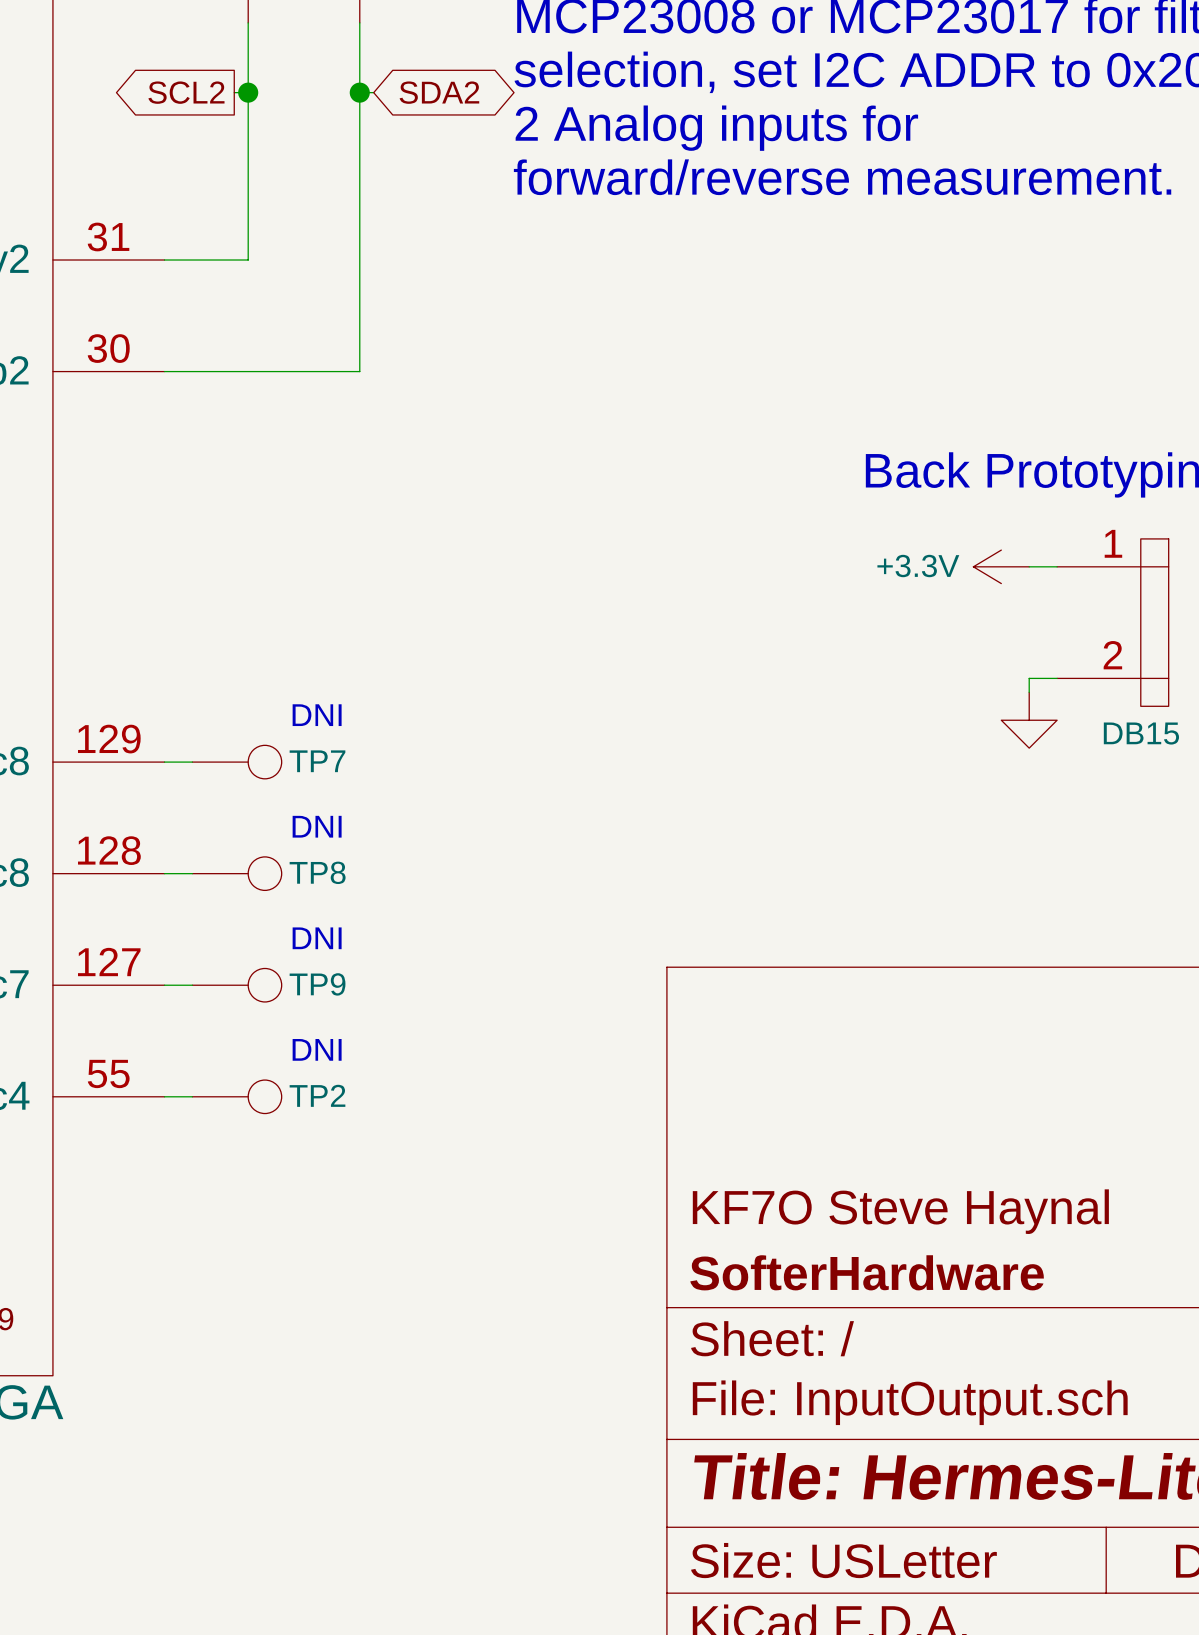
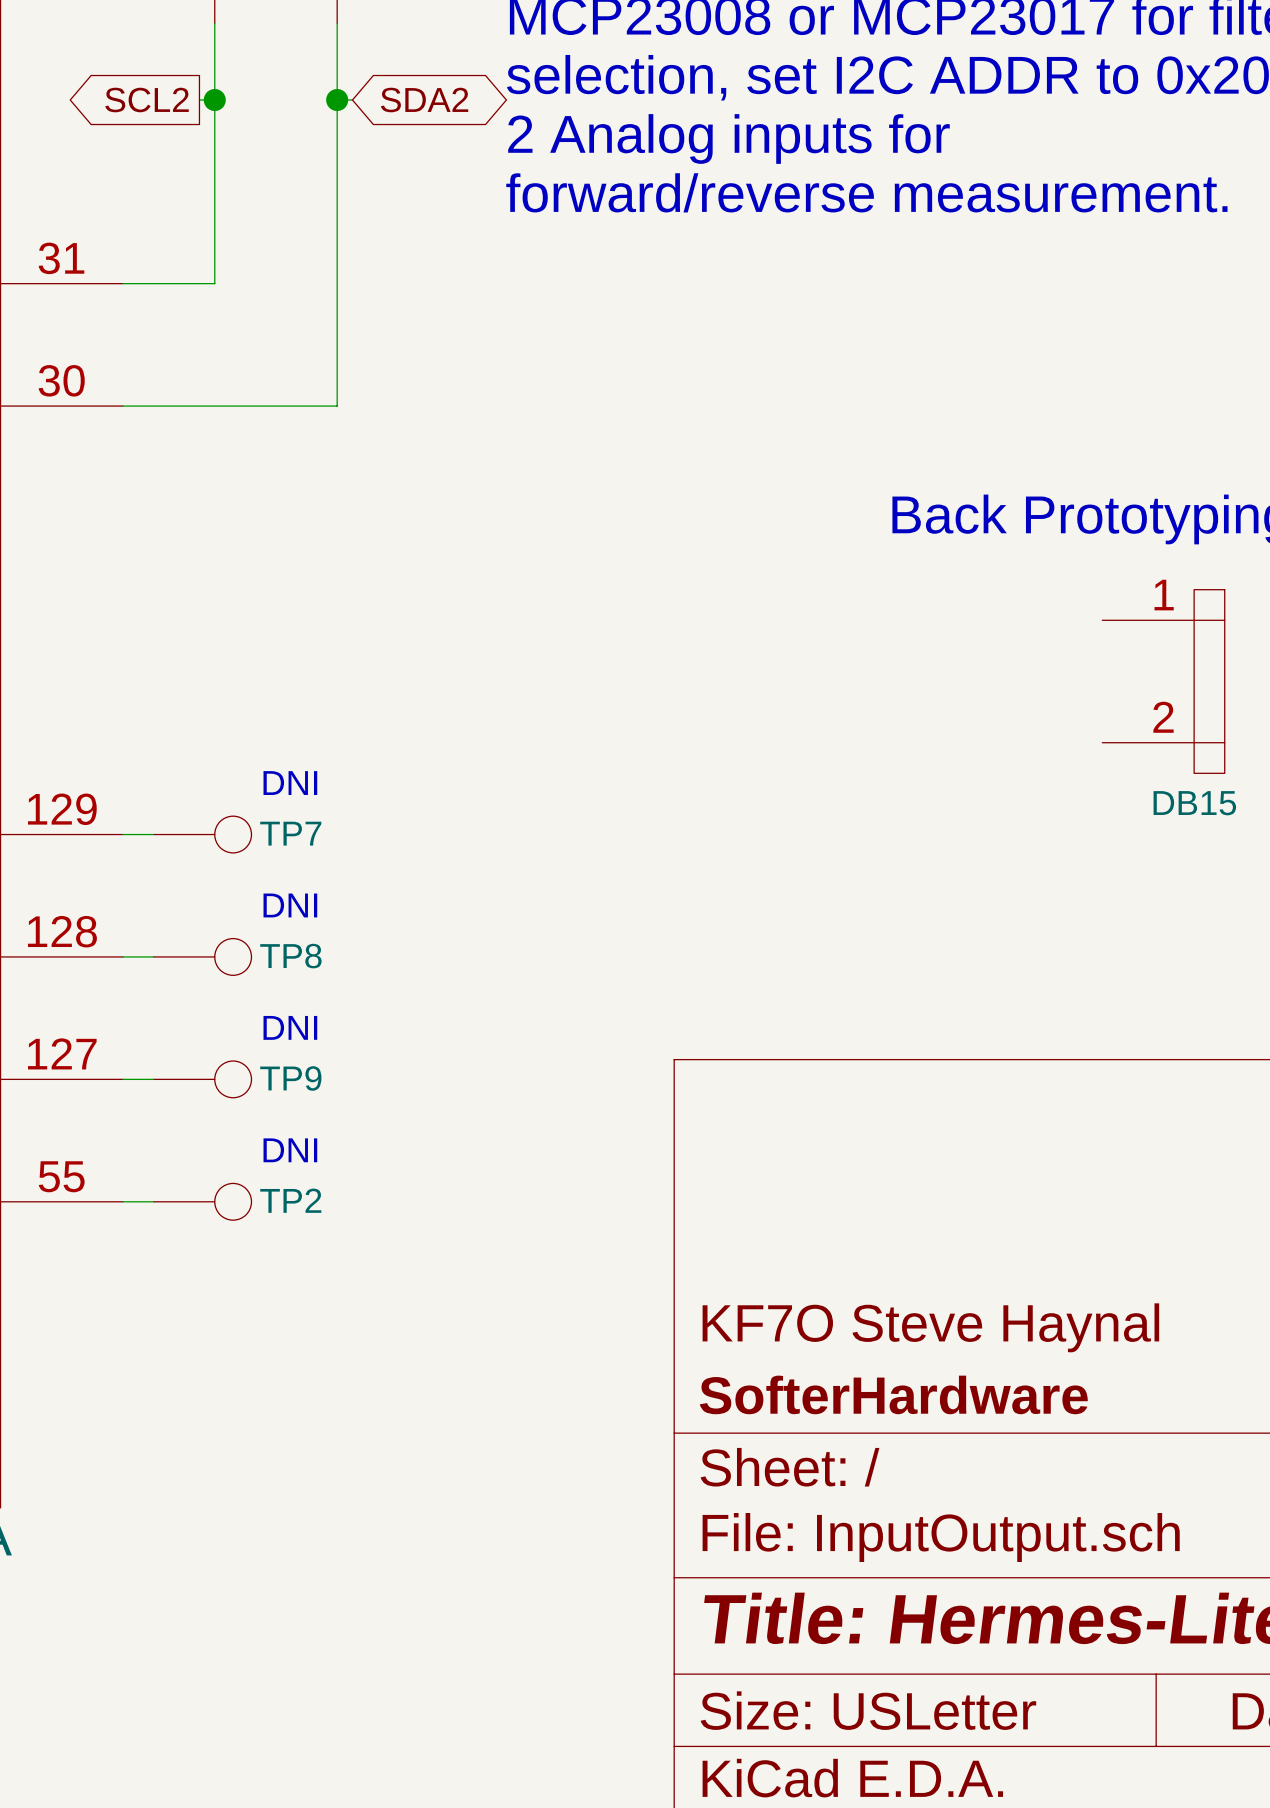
power symbol: +3.3V (1001, 566) -> none
wire: (1029, 566) (1057, 566) -> none
wire: (1057, 678) (1029, 678) (1029, 692) -> none
power symbol: (1029, 720) -> none

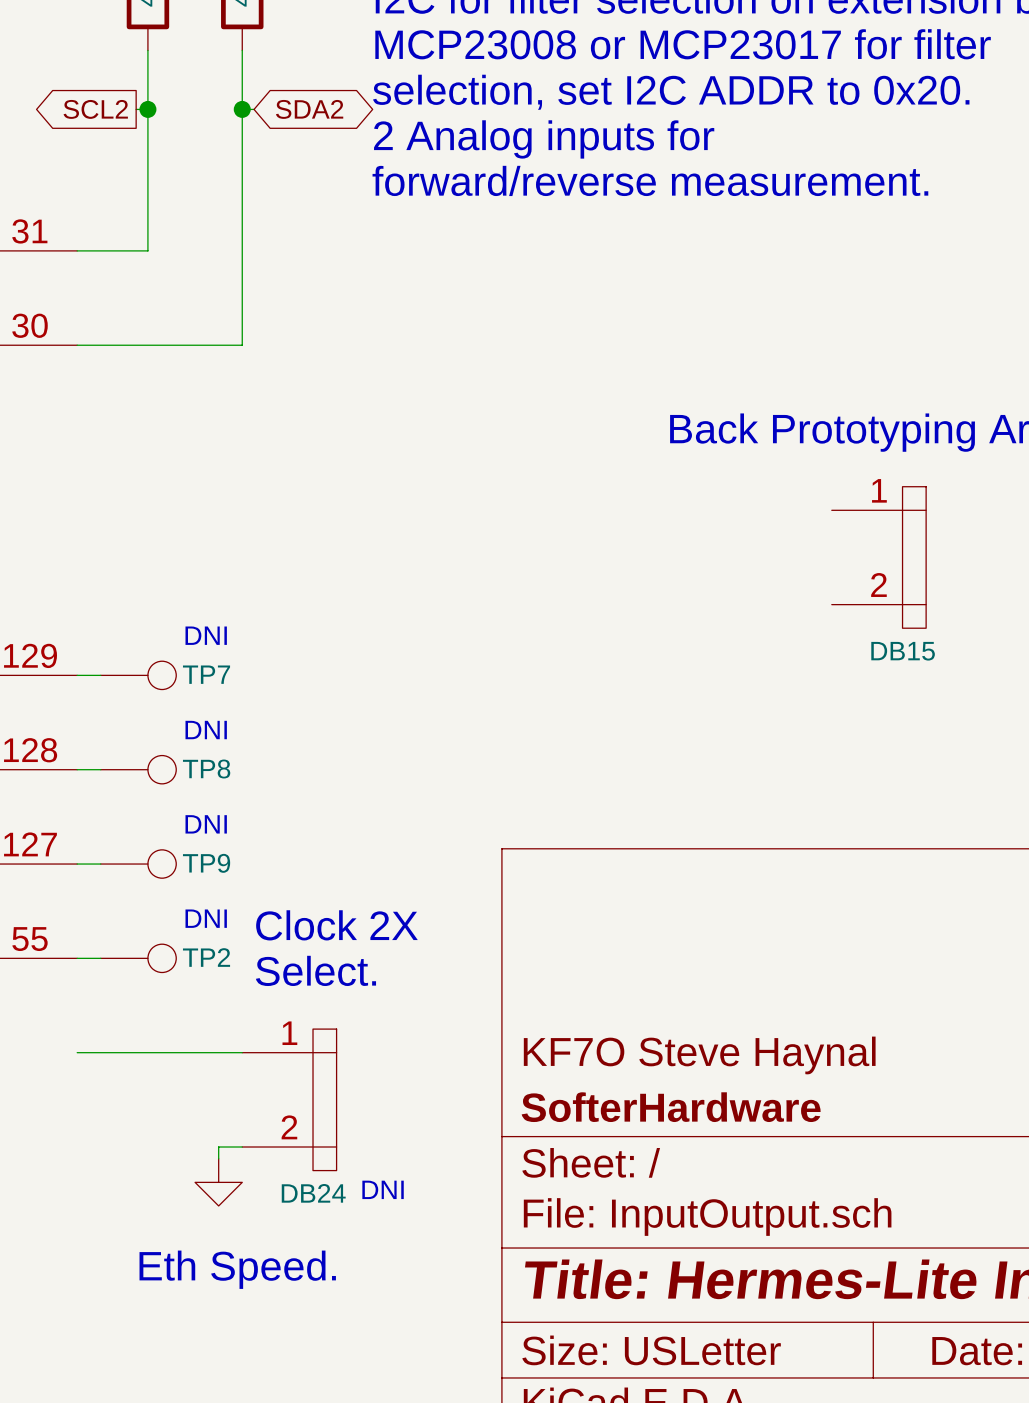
text: none -> Clock 2X (336, 925)
text: none -> Select. (315, 970)
wire: none -> (77, 1052) (242, 1052)
DB24: none -> (289, 1099)
wire: none -> (242, 1147) (218, 1147) (218, 1158)
power symbol: none -> (218, 1182)
text: none -> DNI (383, 1189)
text: none -> Eth Speed. (237, 1269)

